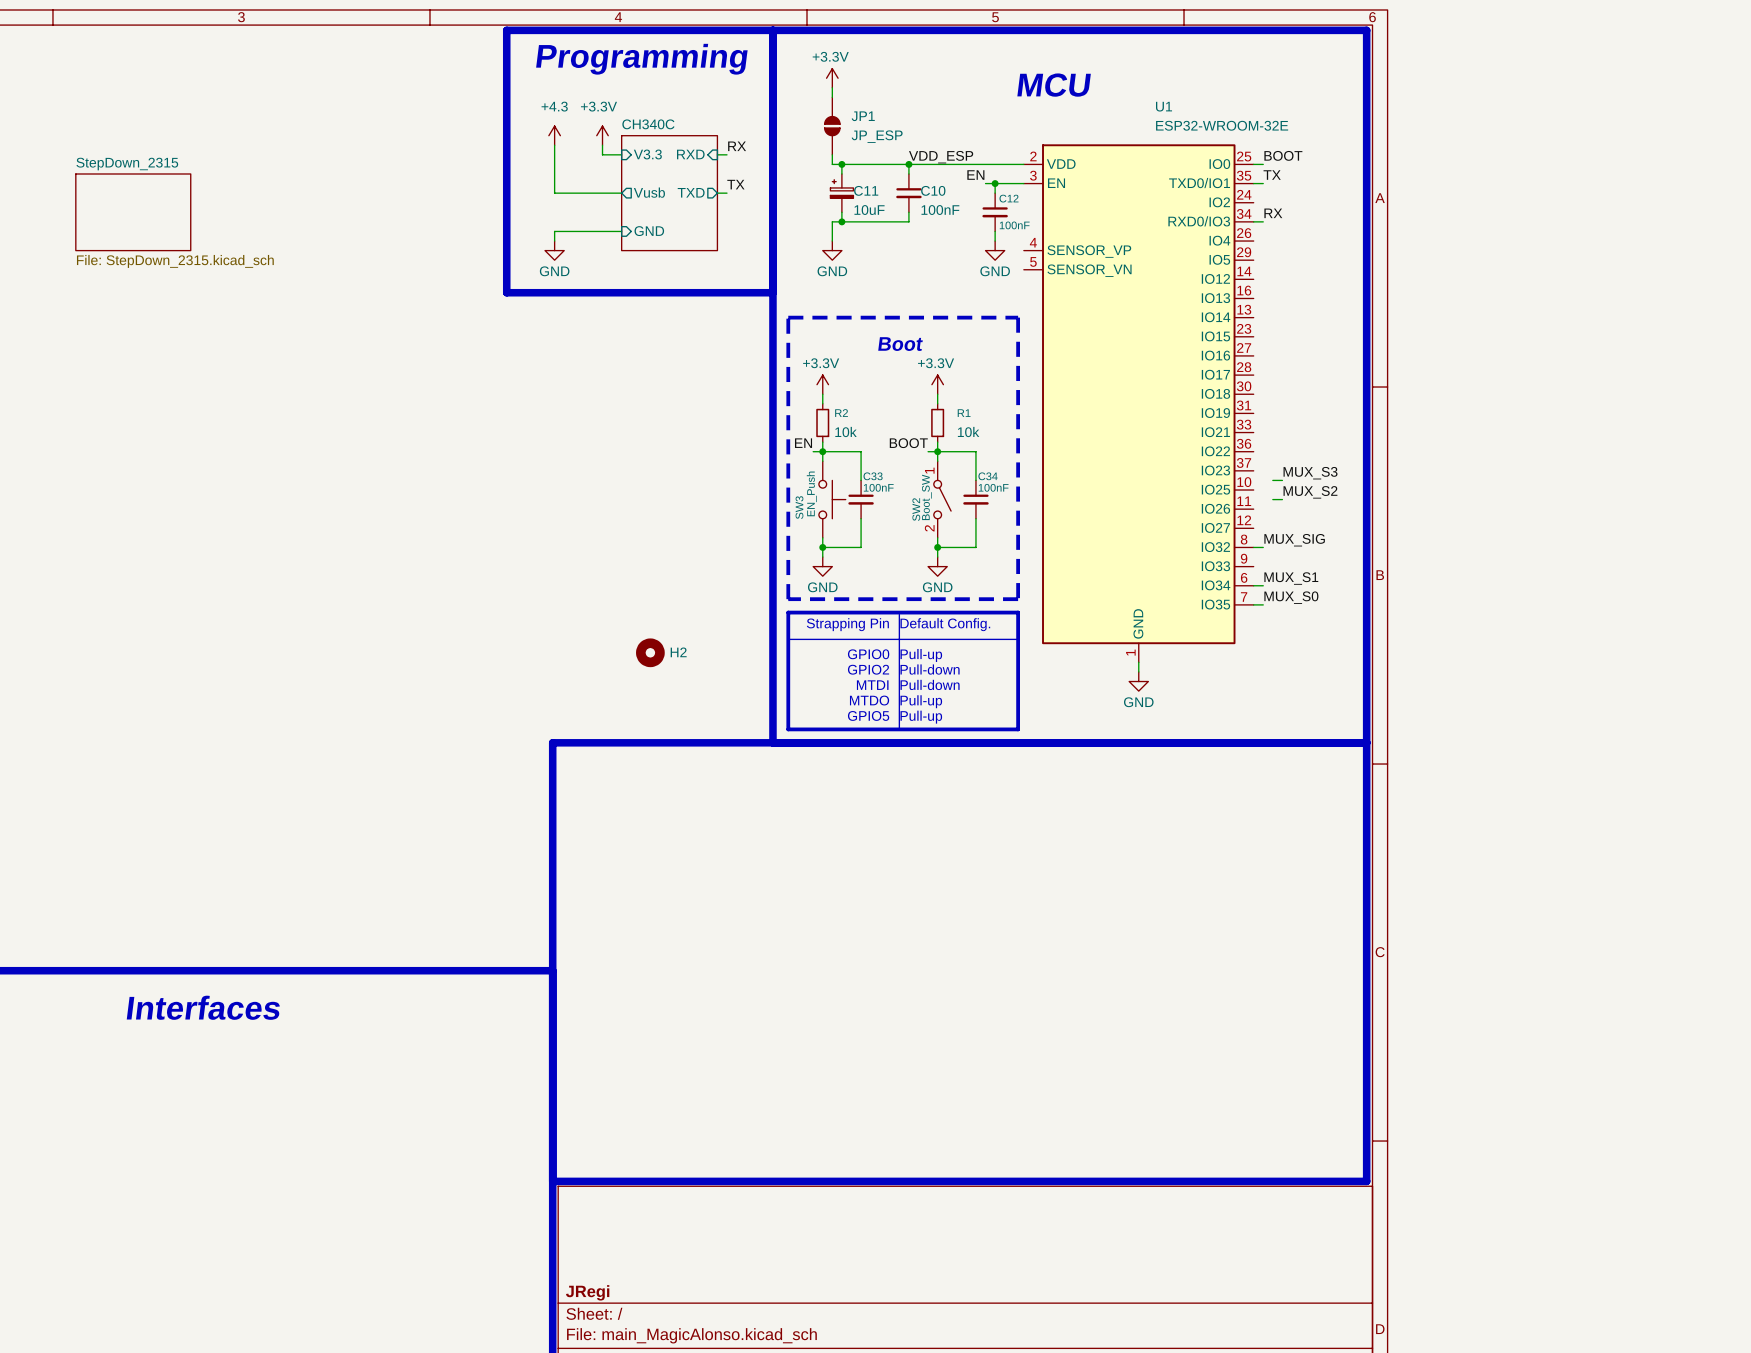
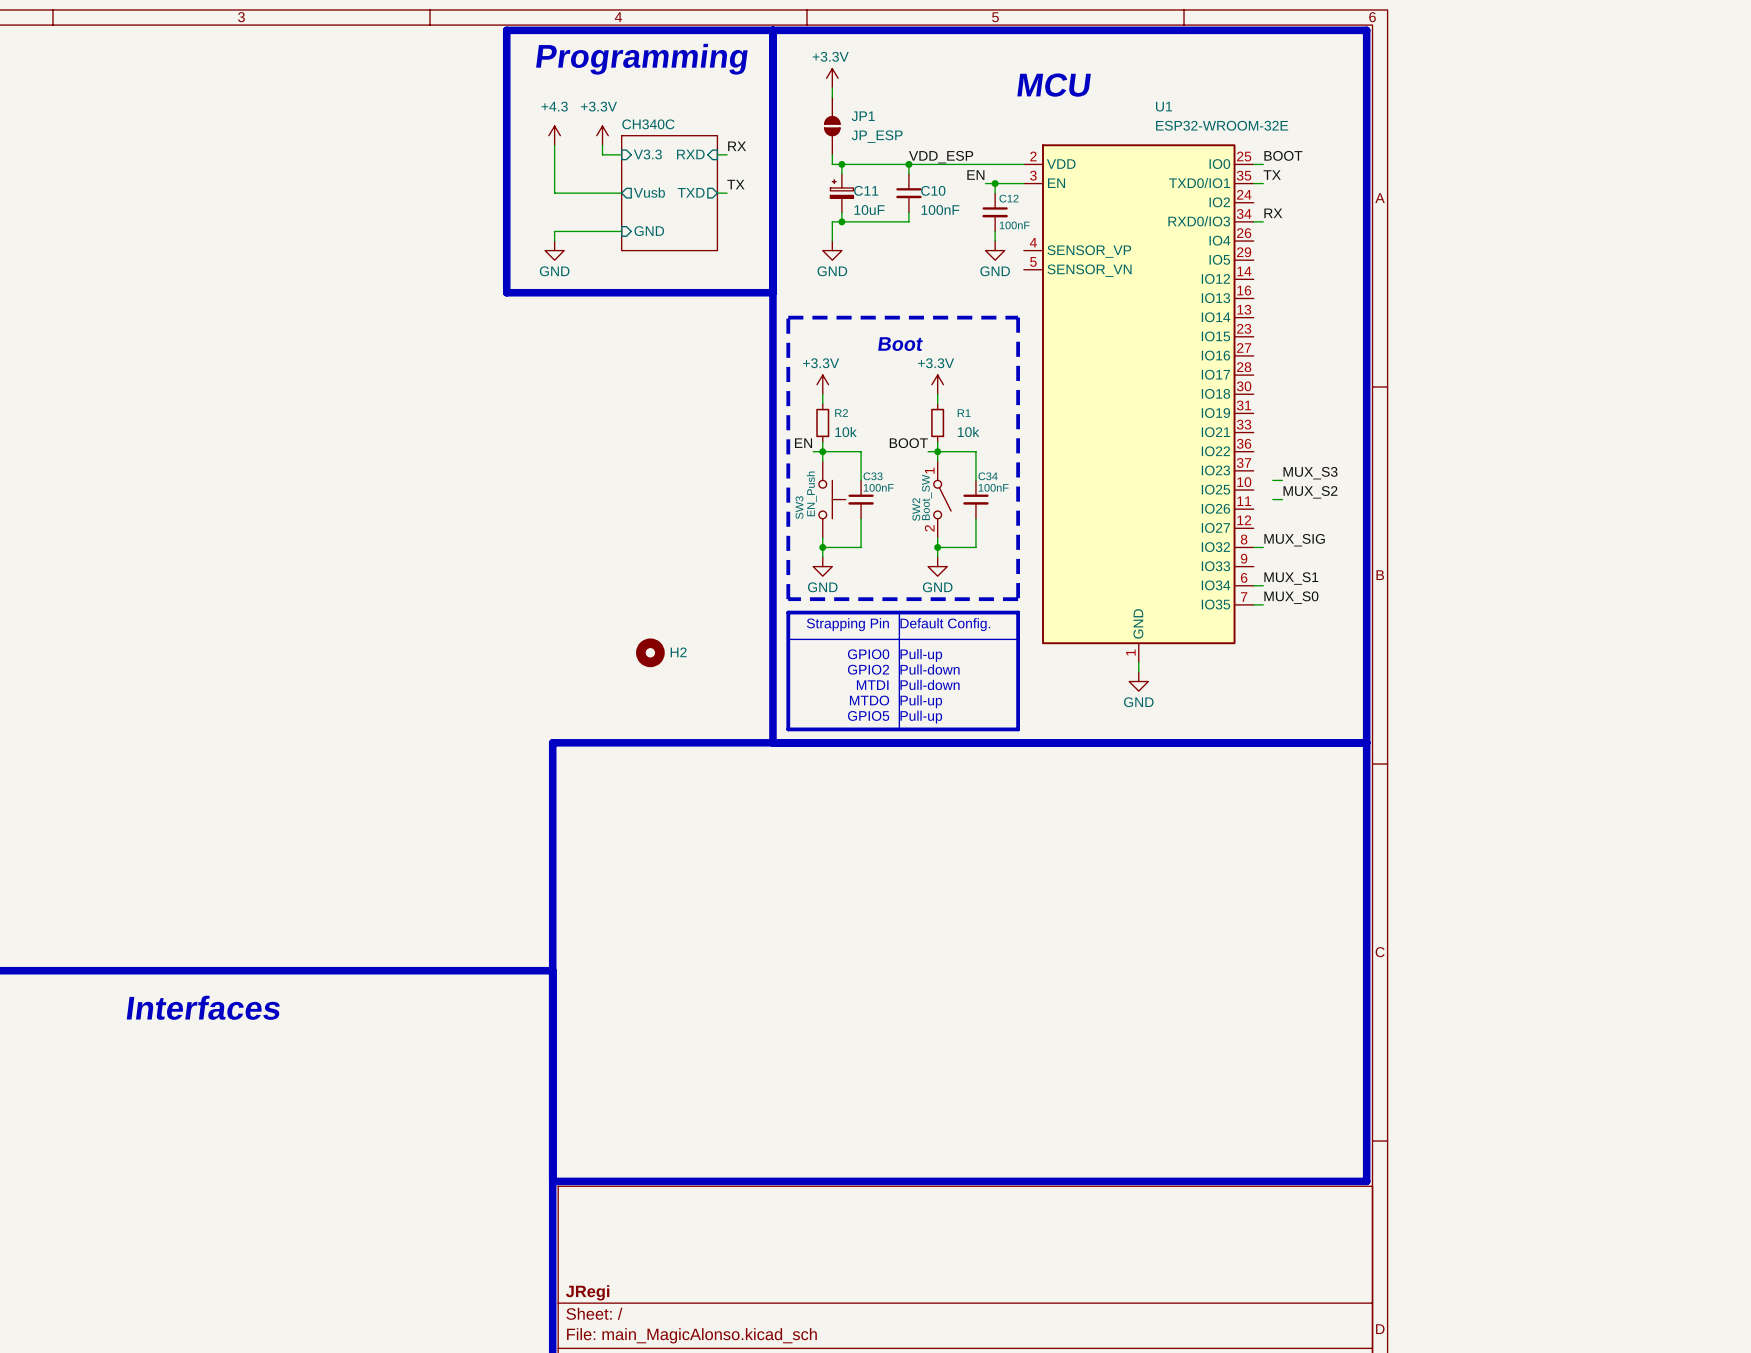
sheet StepDown_2315: File: StepDown_2315.kicad_sch (133, 212) -> none

